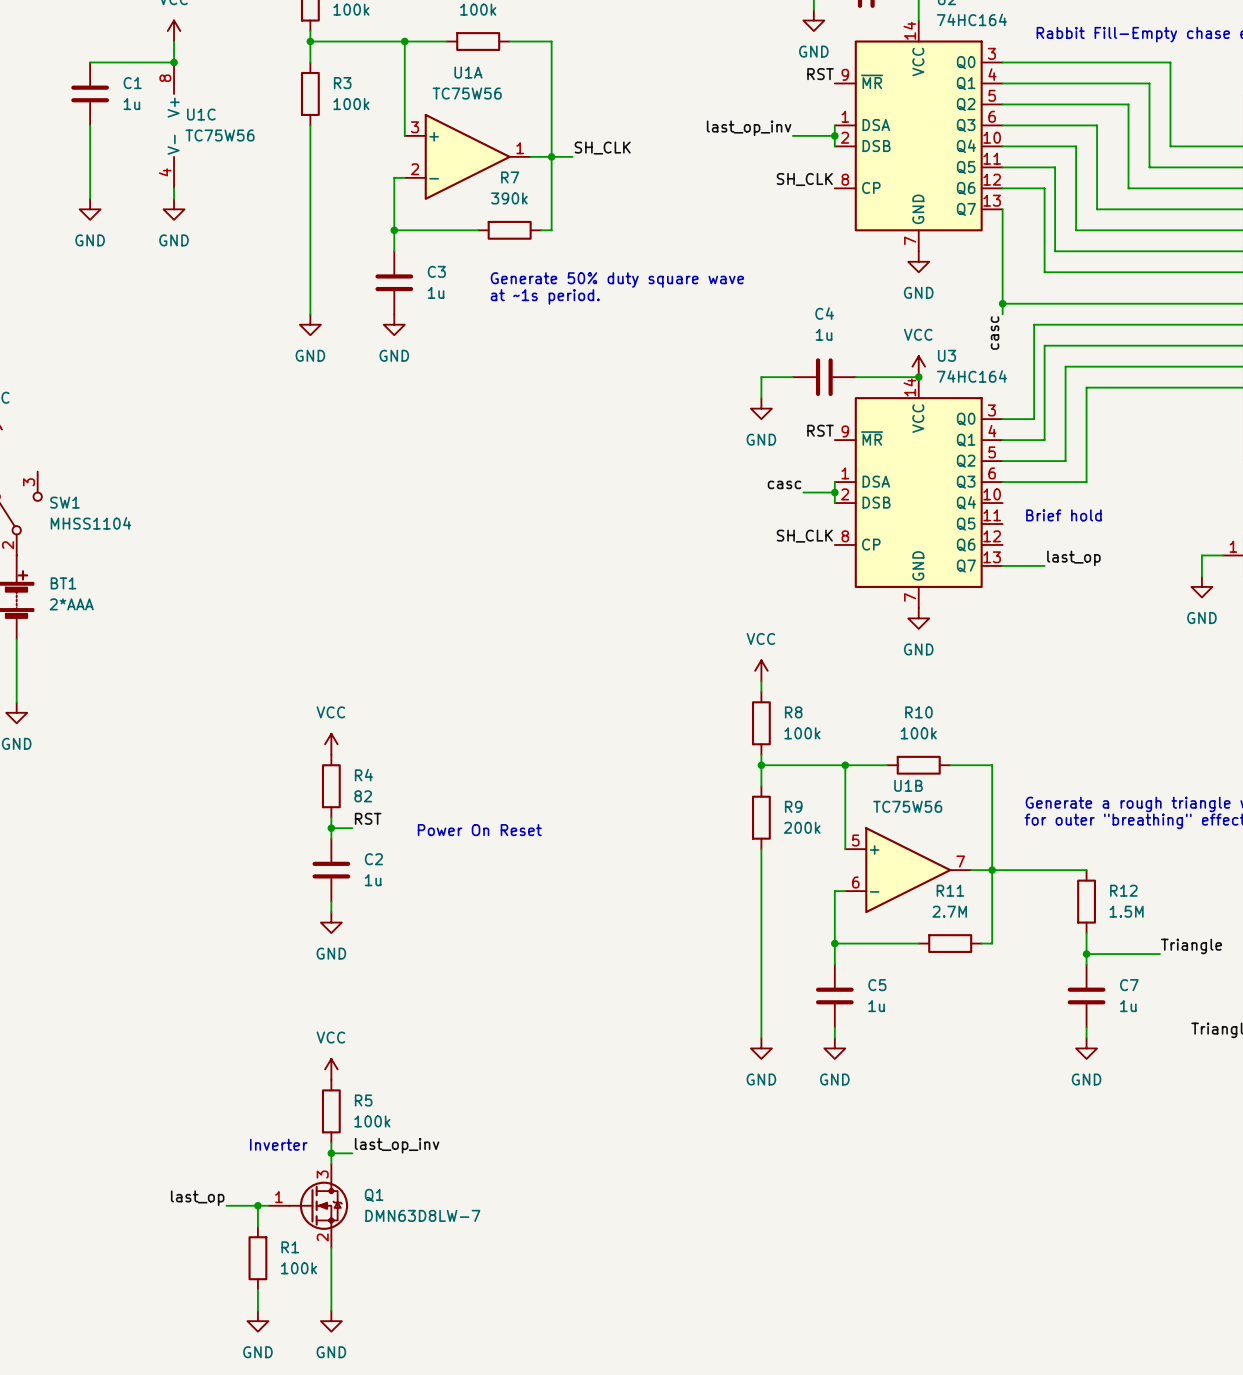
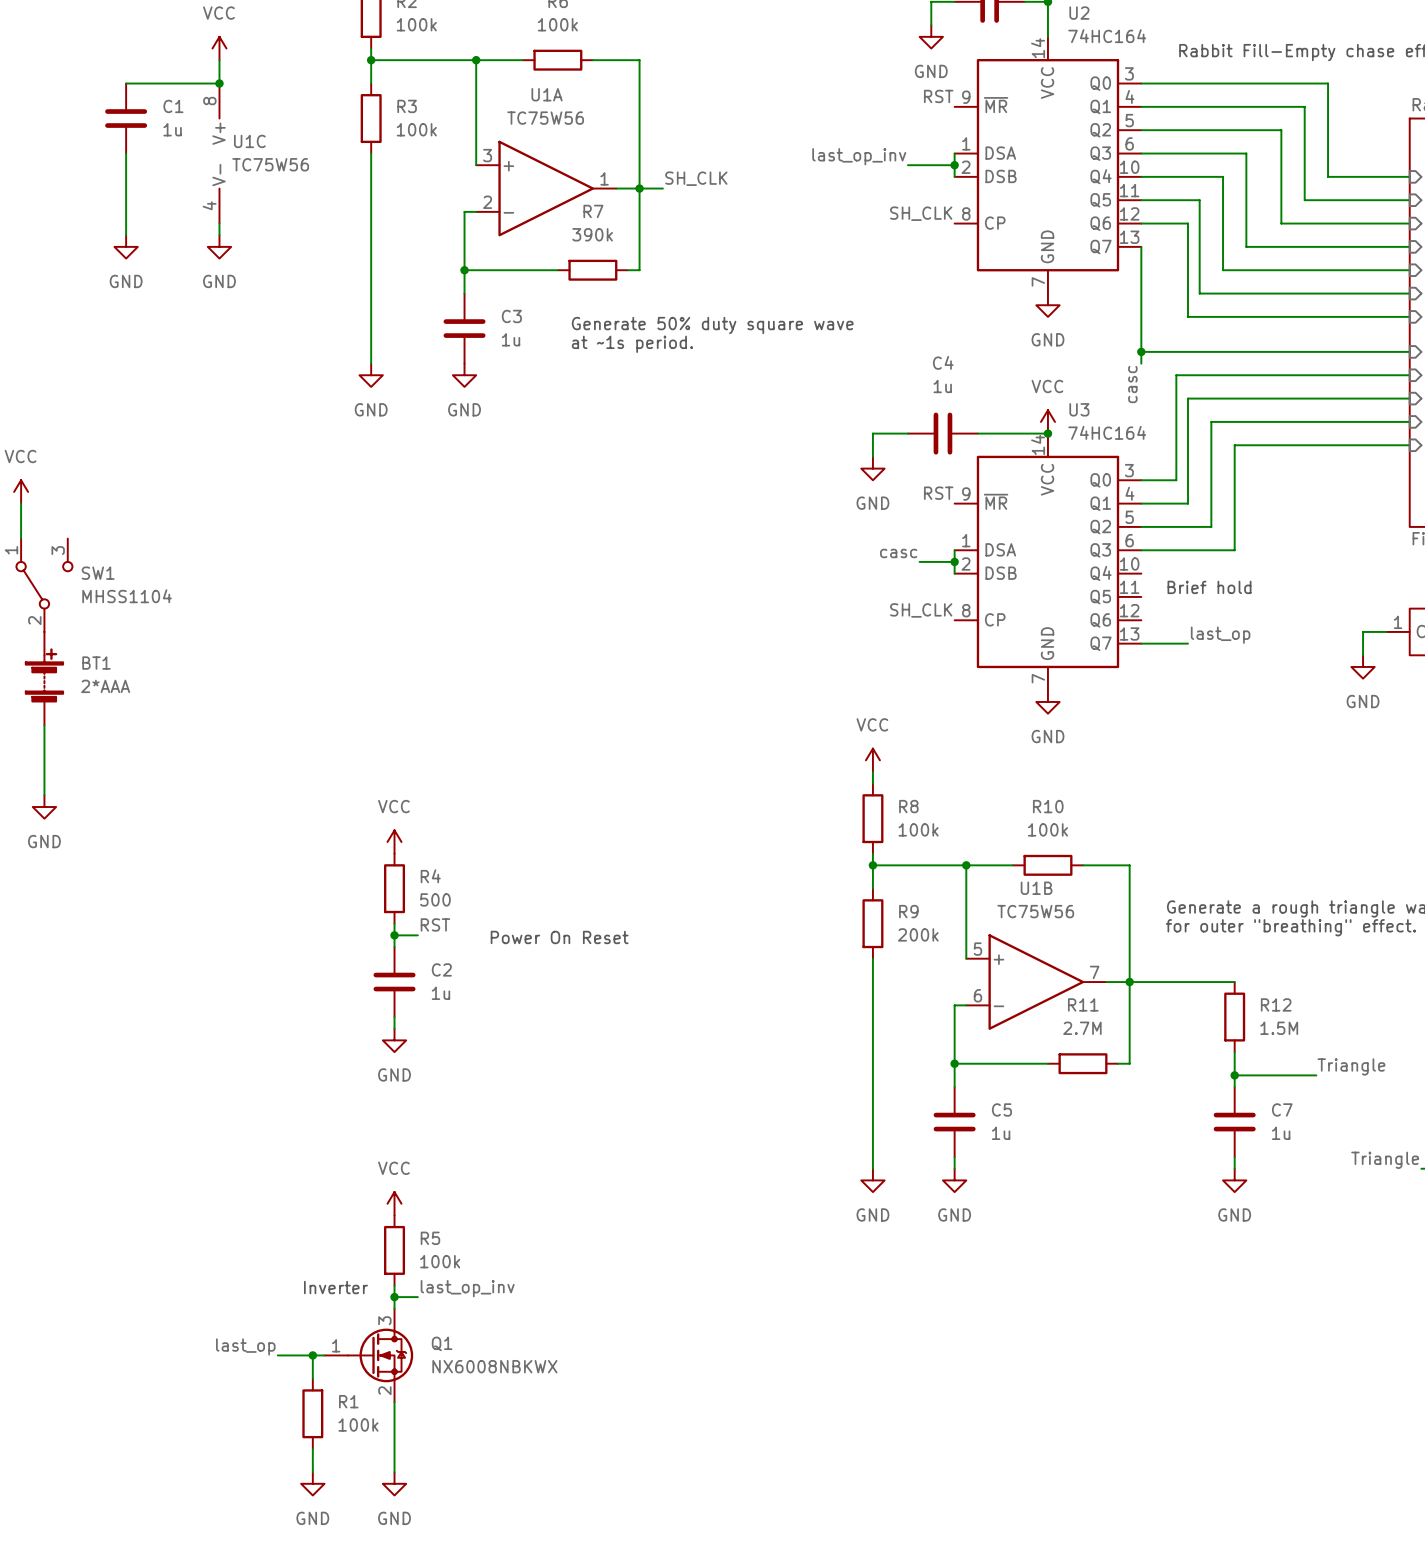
R4 value: 82 (363, 796) -> 500 (435, 899)
Q1 value: DMN63D8LW-7 (422, 1215) -> NX6008NBKWX (494, 1366)

